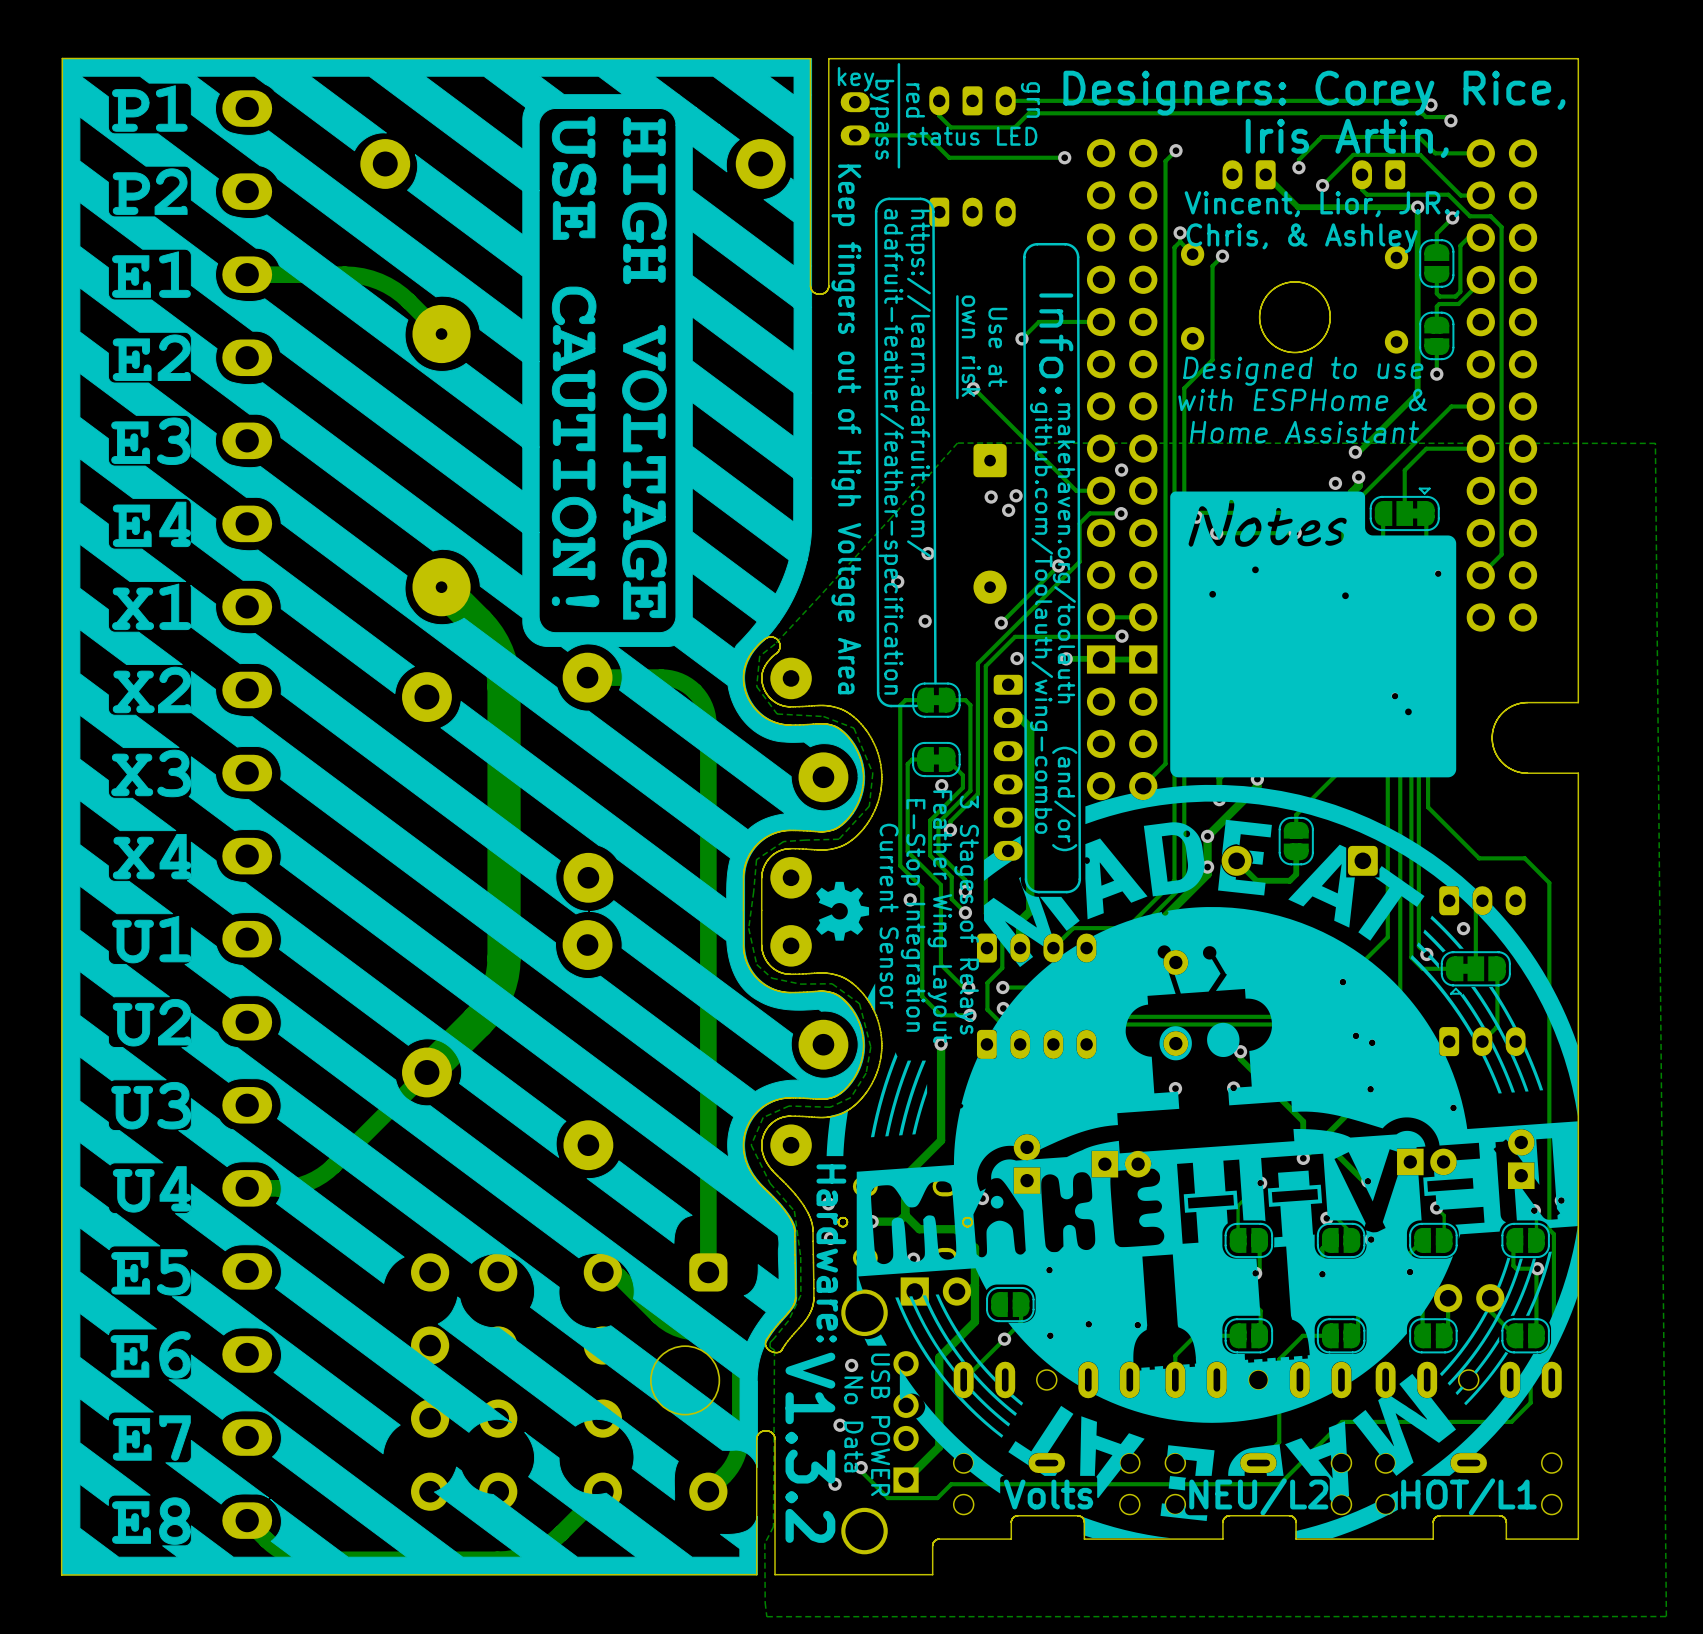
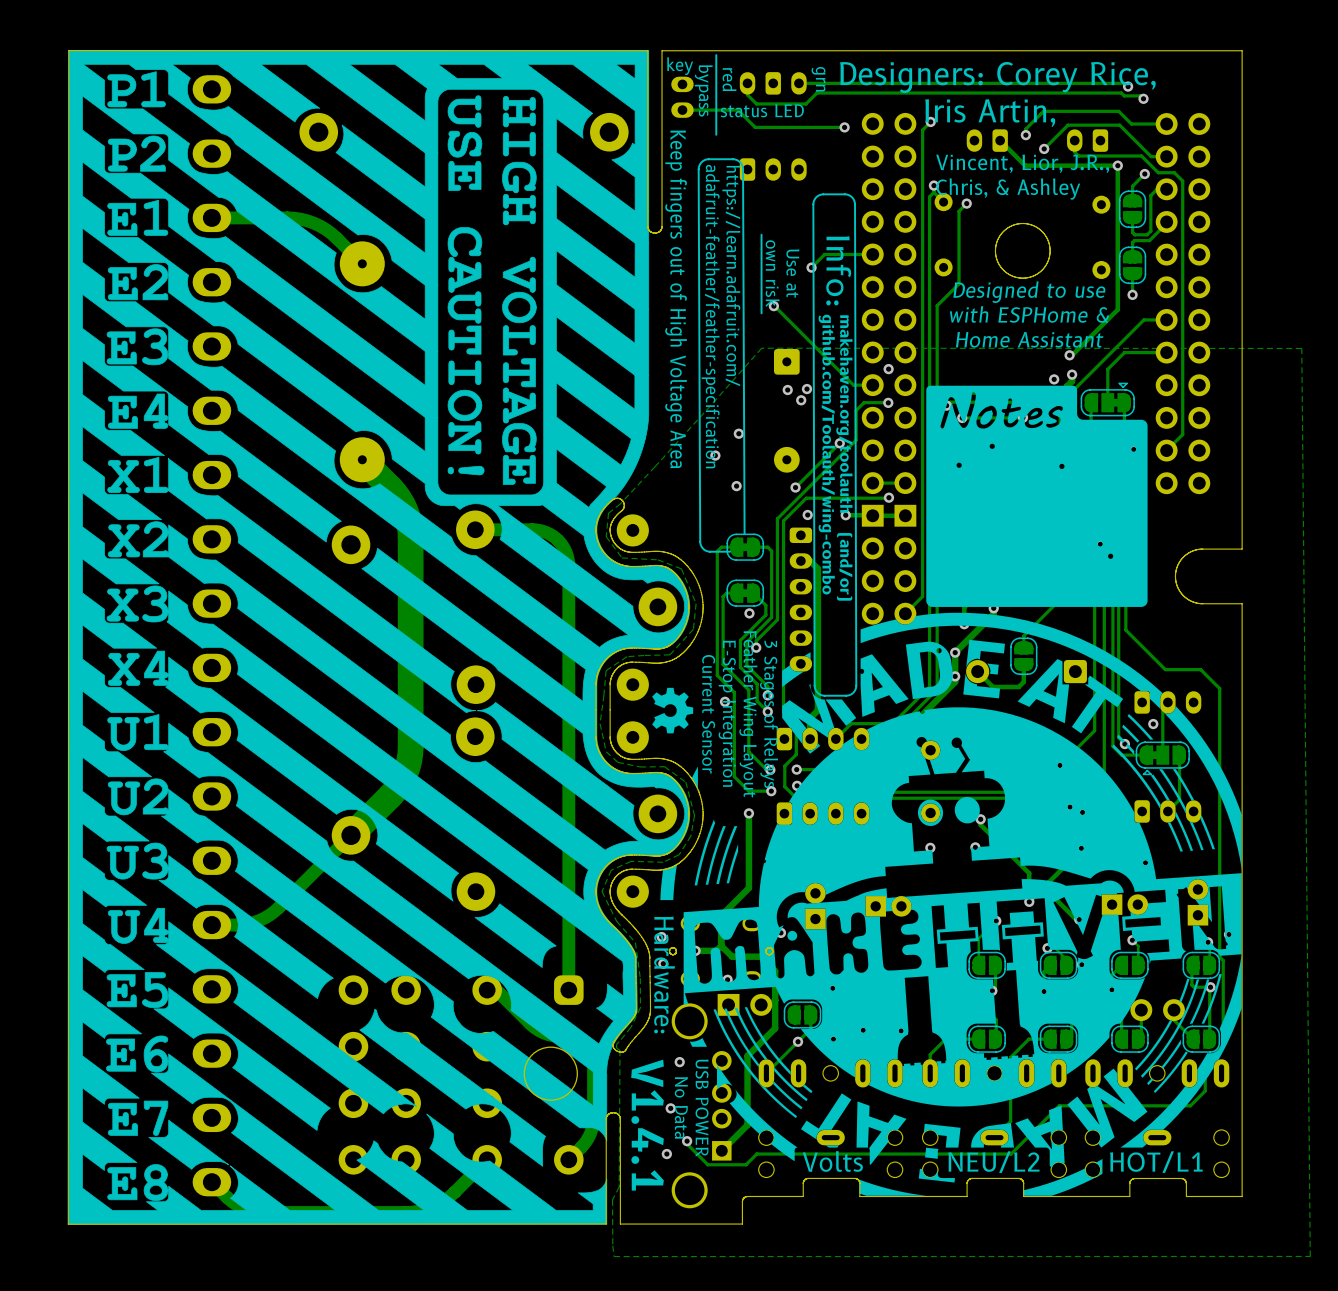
text: V1.3.2 (810, 1447) -> V1.4.1 (647, 1125)

